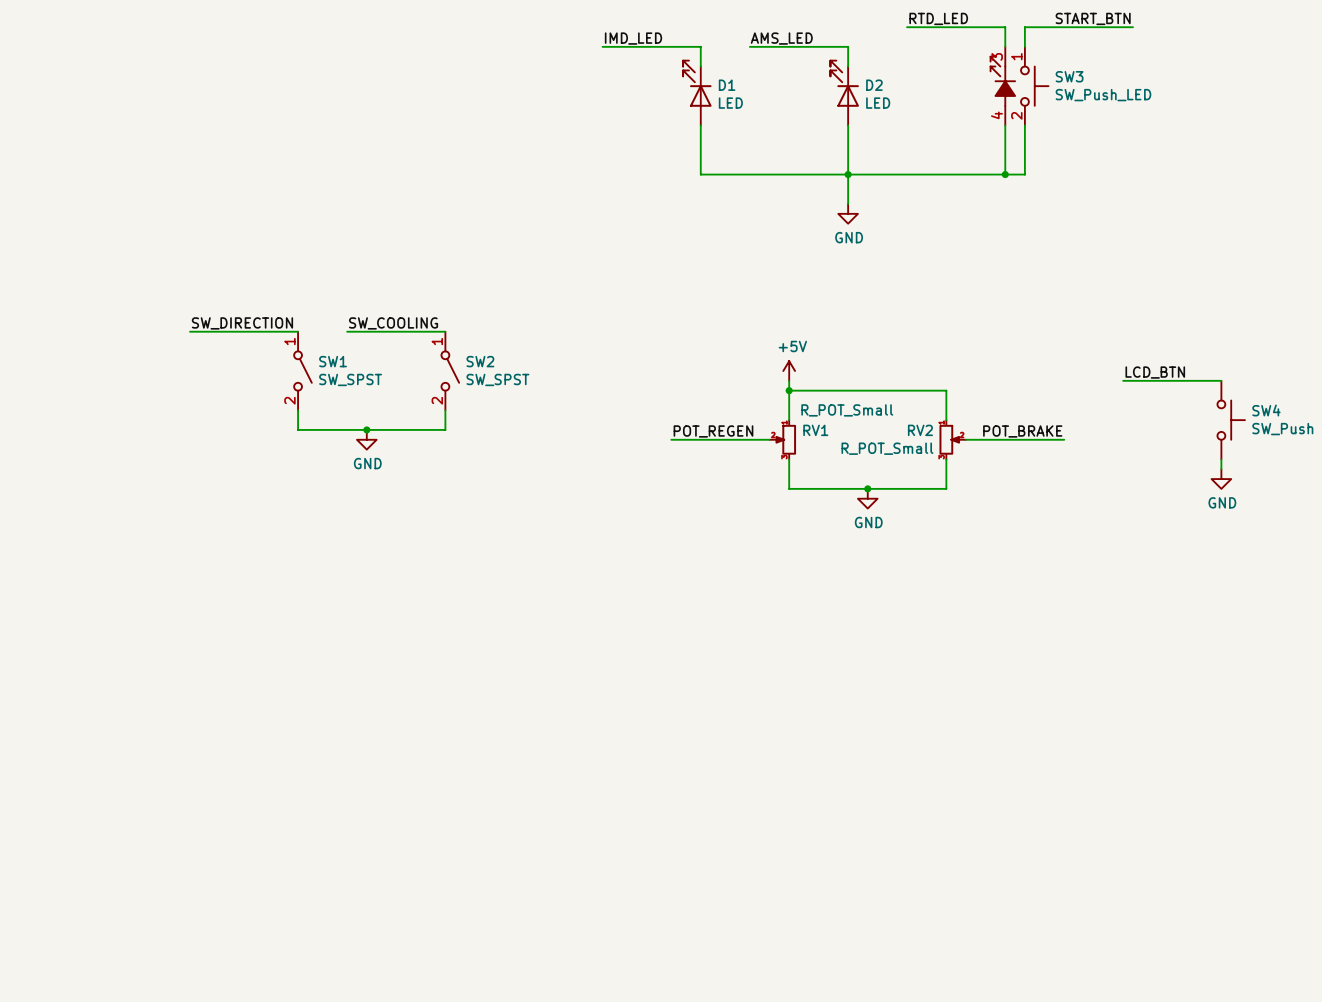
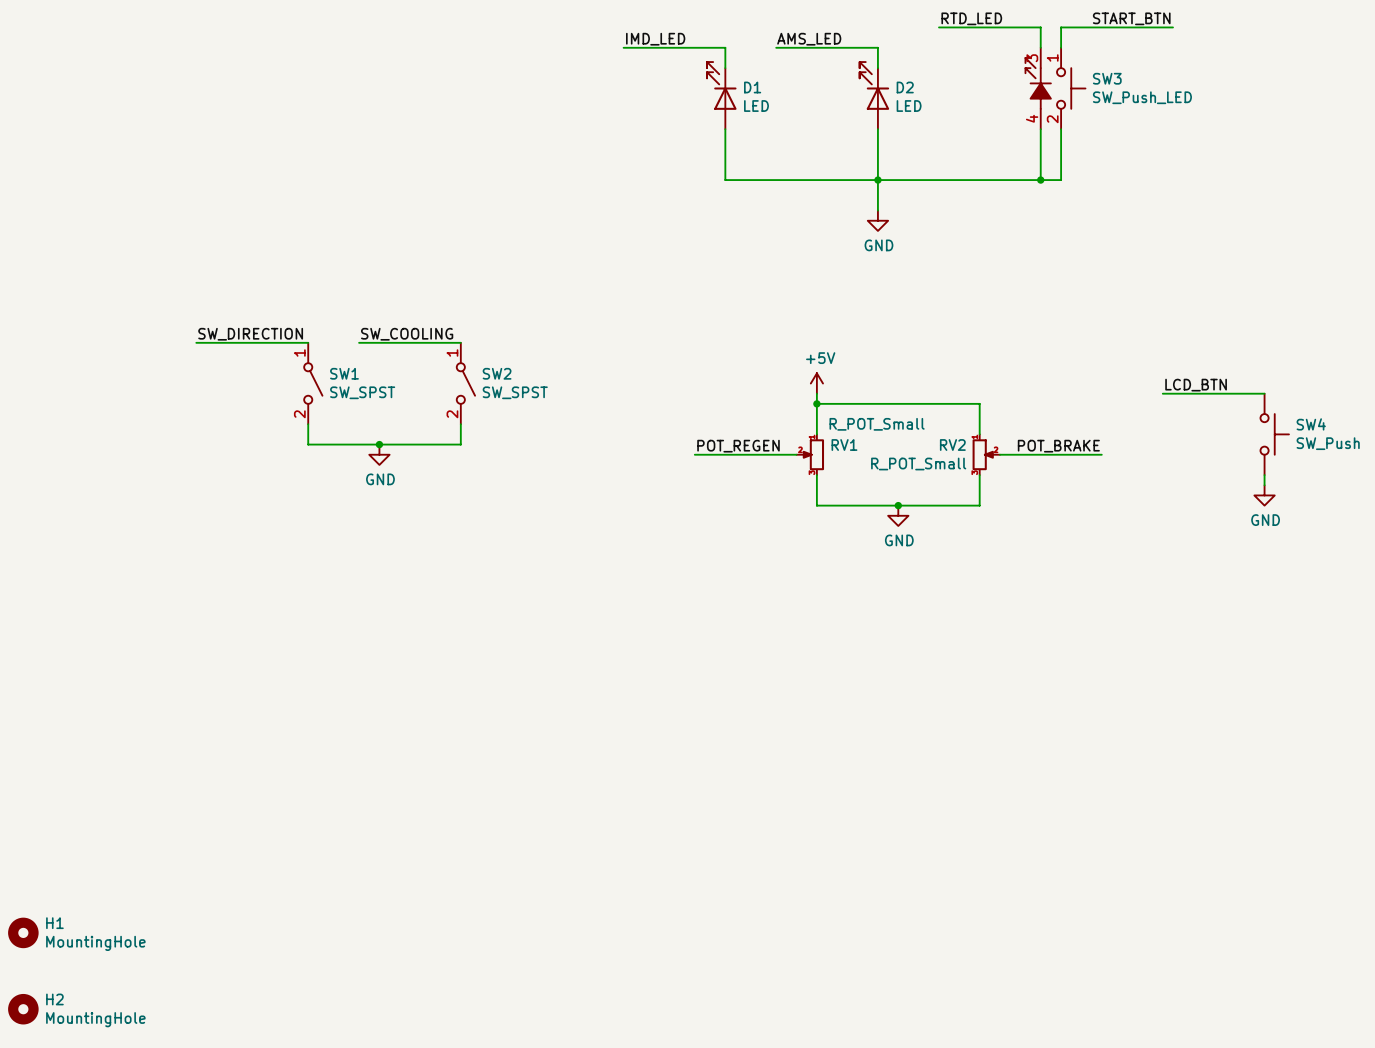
H1: none -> MountingHole (23, 932)
H2: none -> MountingHole (23, 1009)

